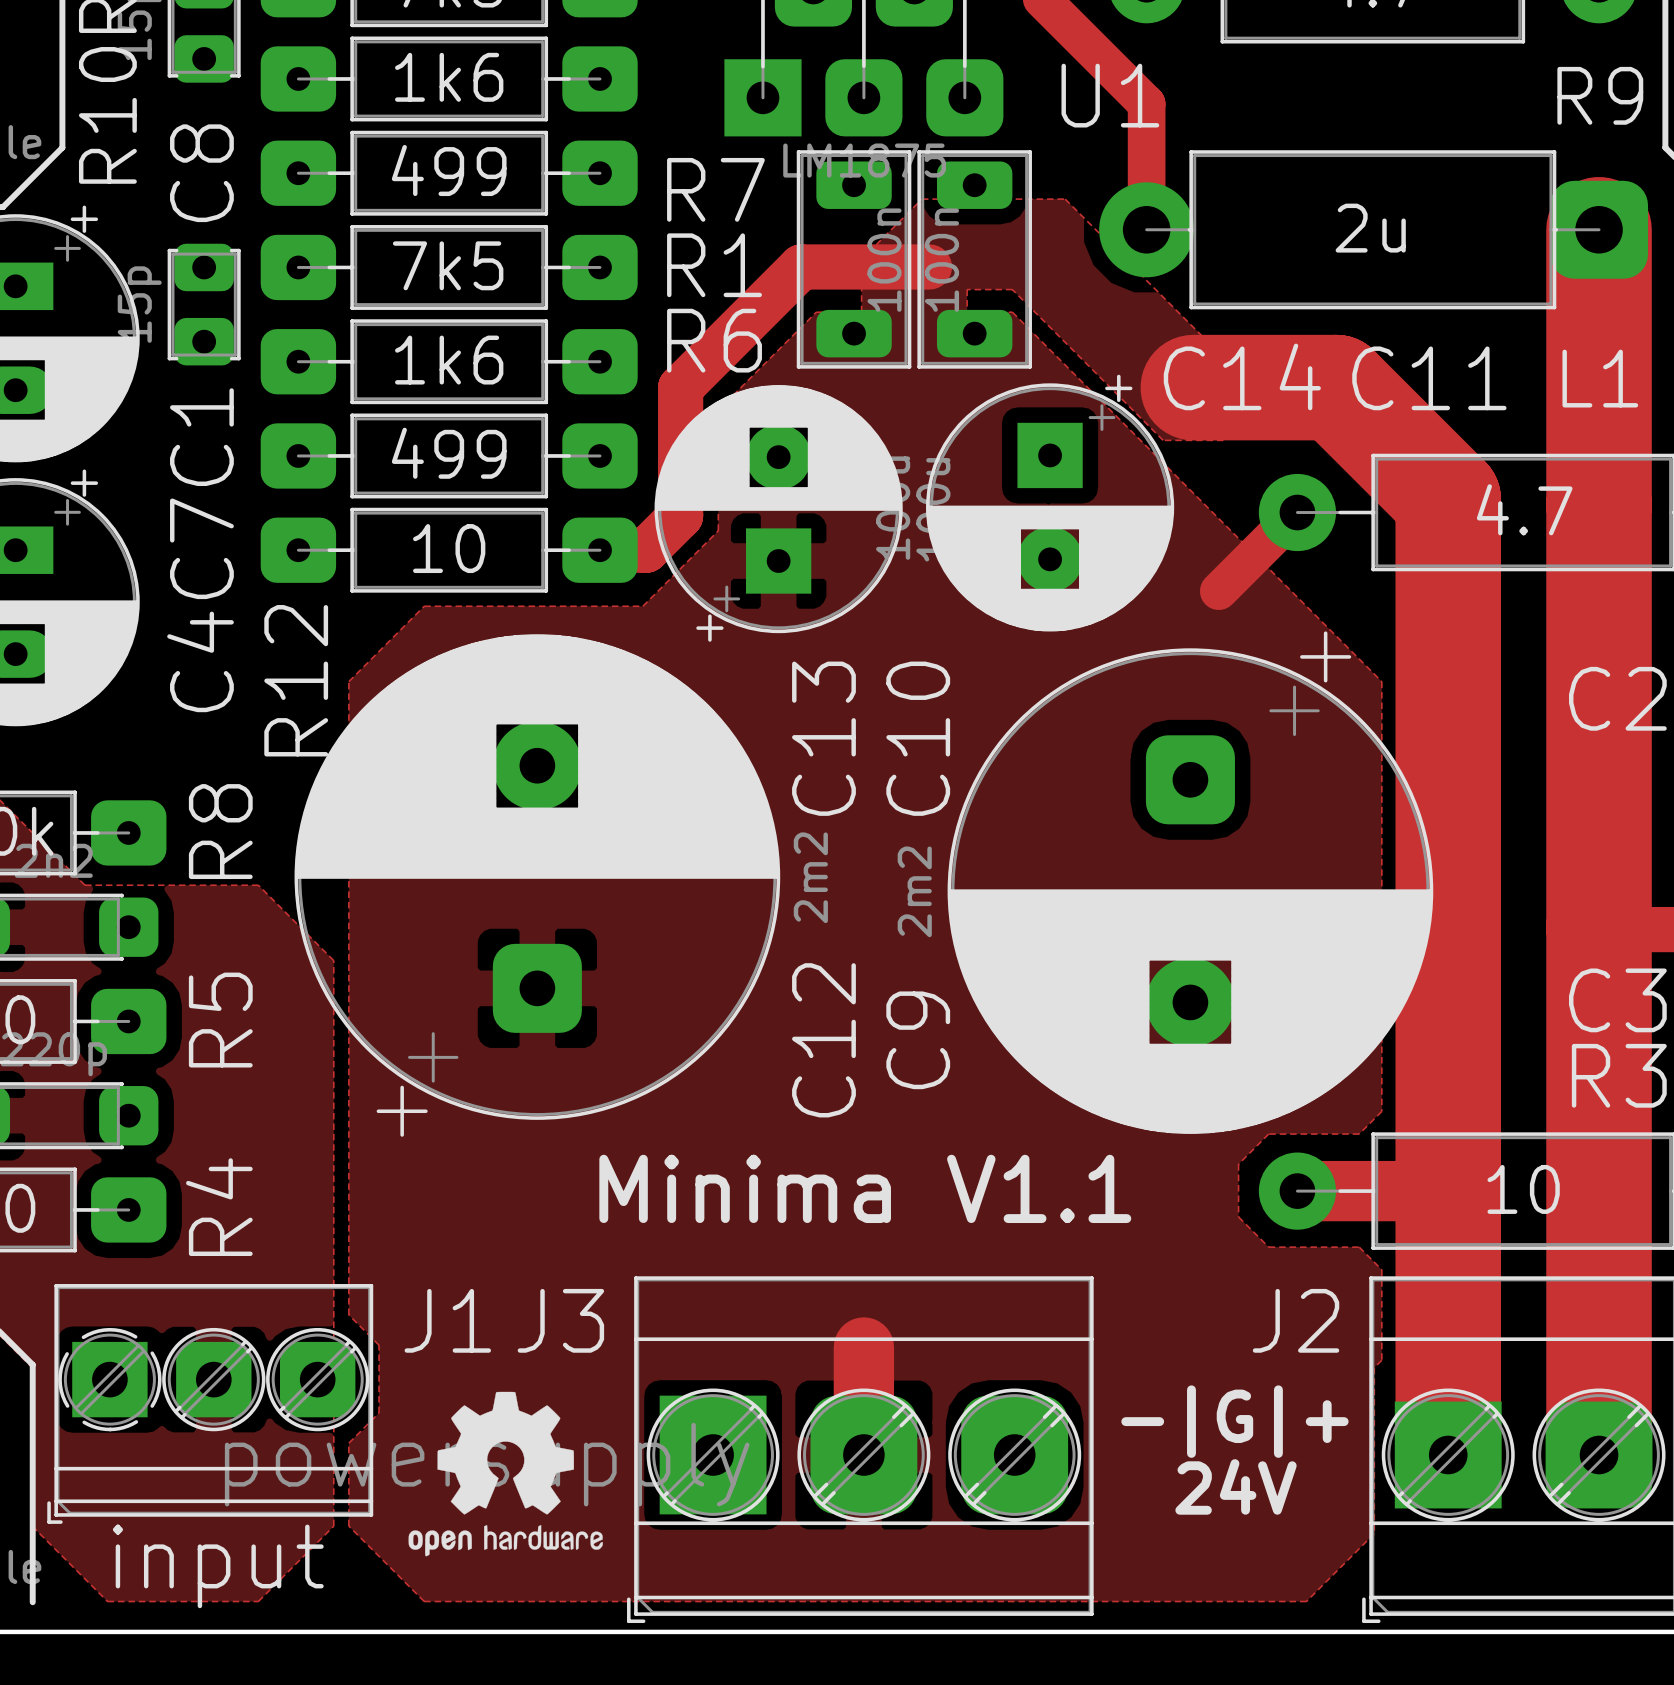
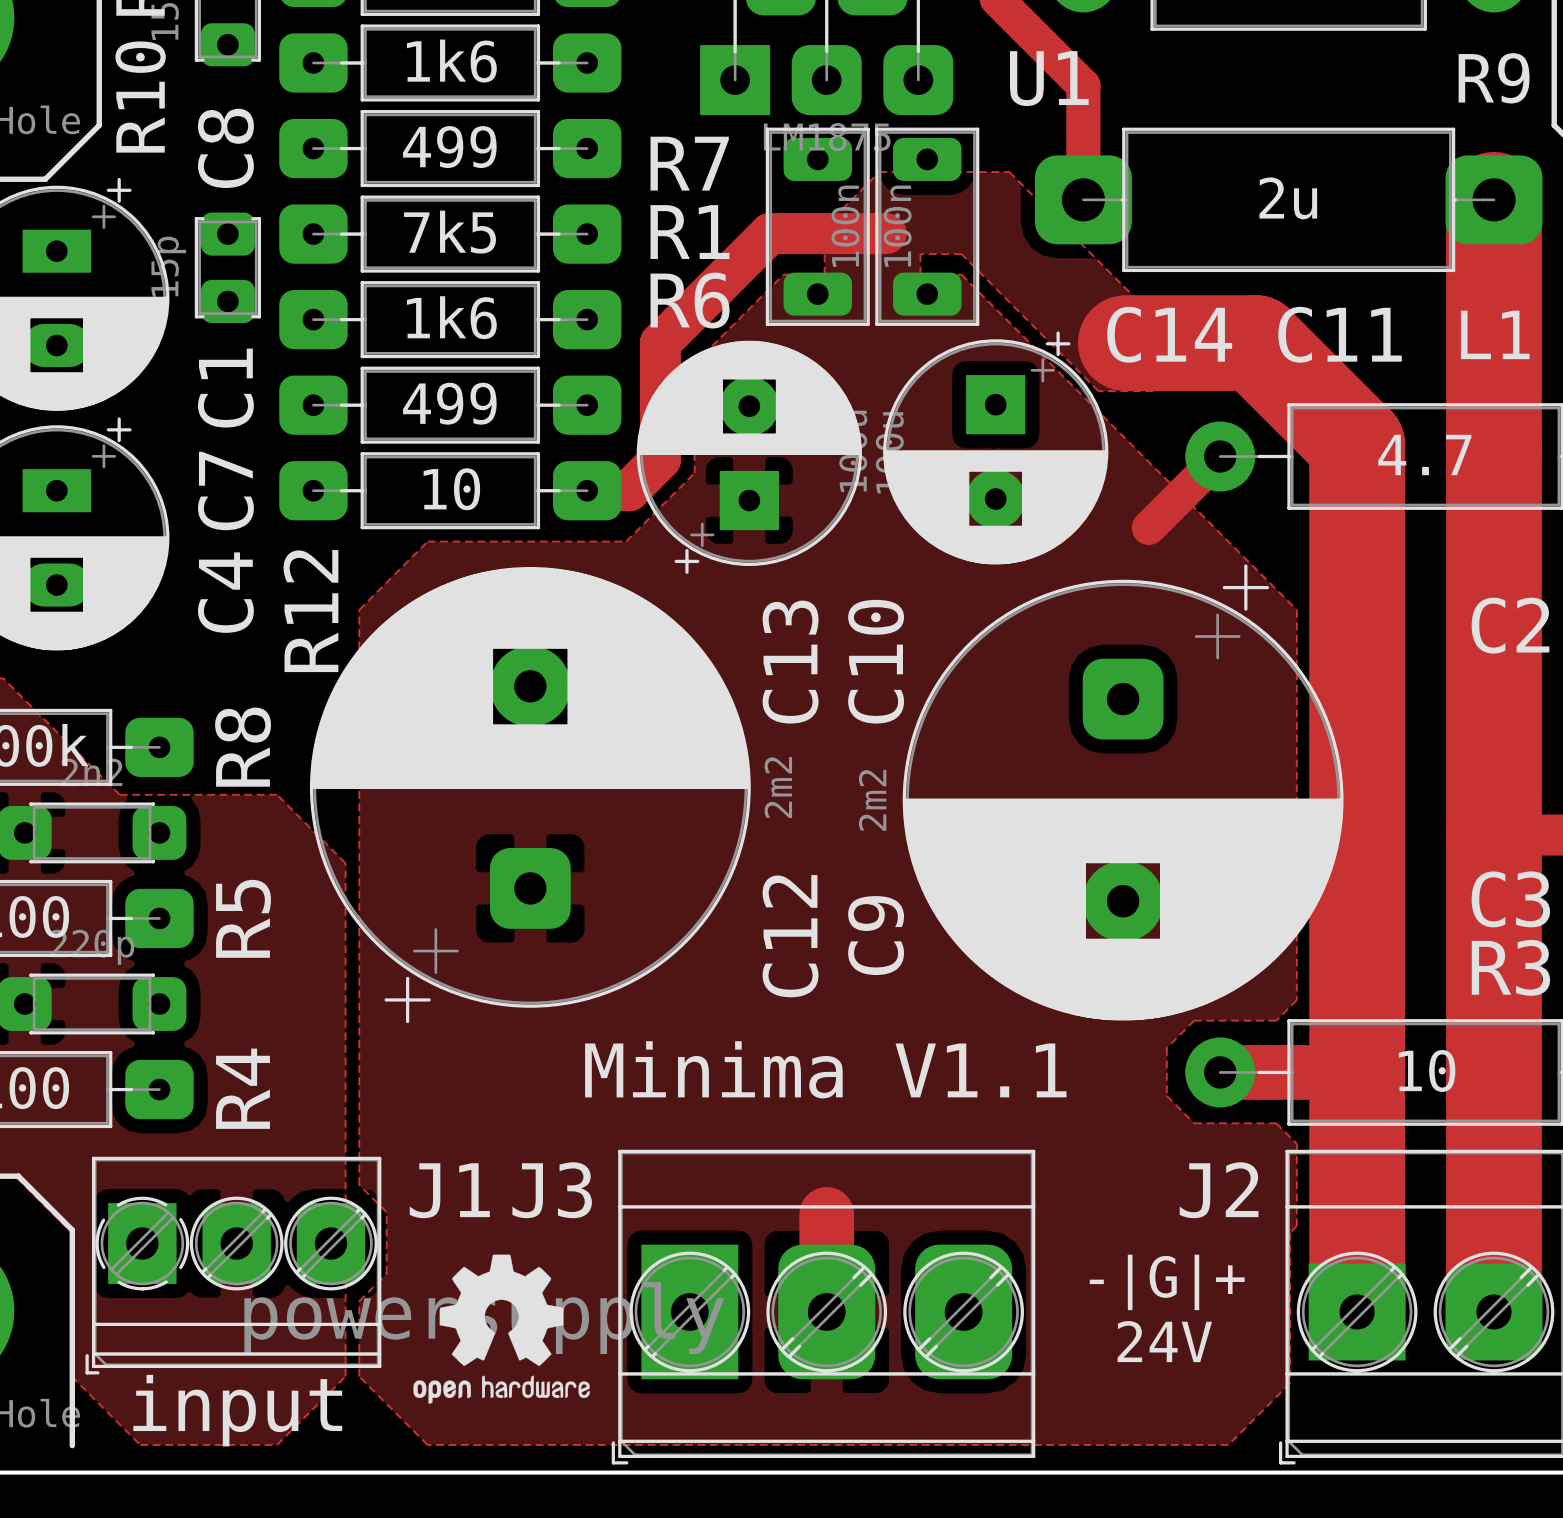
L1 footprint: [1099, 150, 1649, 310] -> [1034, 127, 1543, 273]
J3 footprint: [627, 1276, 1094, 1624] -> [611, 1149, 1036, 1465]
J1 footprint: [47, 1284, 374, 1524] -> [85, 1156, 382, 1375]

